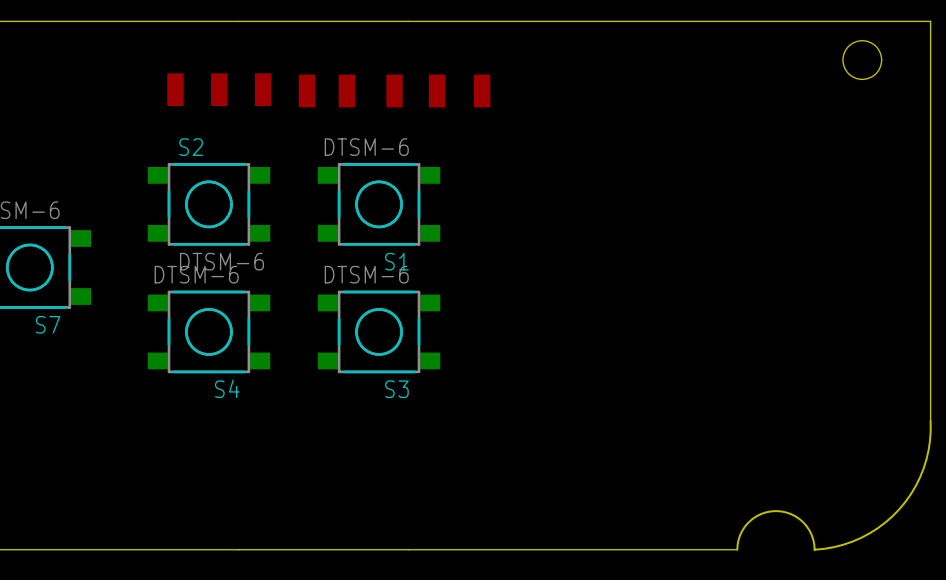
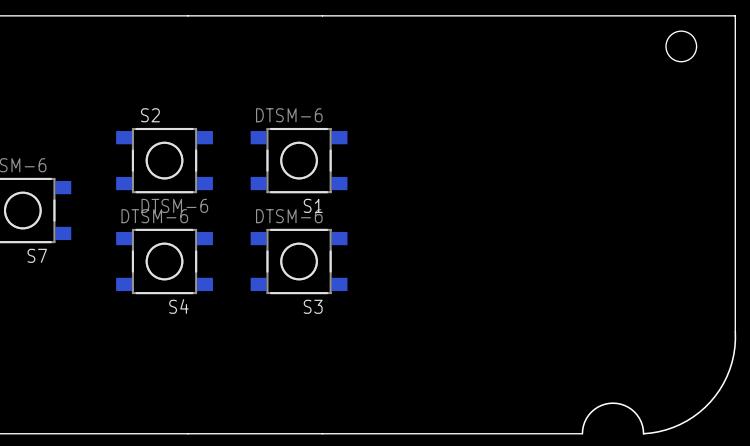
part: (175, 89) -> none
part: (219, 89) -> none
part: (263, 89) -> none
part: (306, 90) -> none
part: (346, 90) -> none
part: (394, 90) -> none
part: (437, 90) -> none
part: (482, 90) -> none

